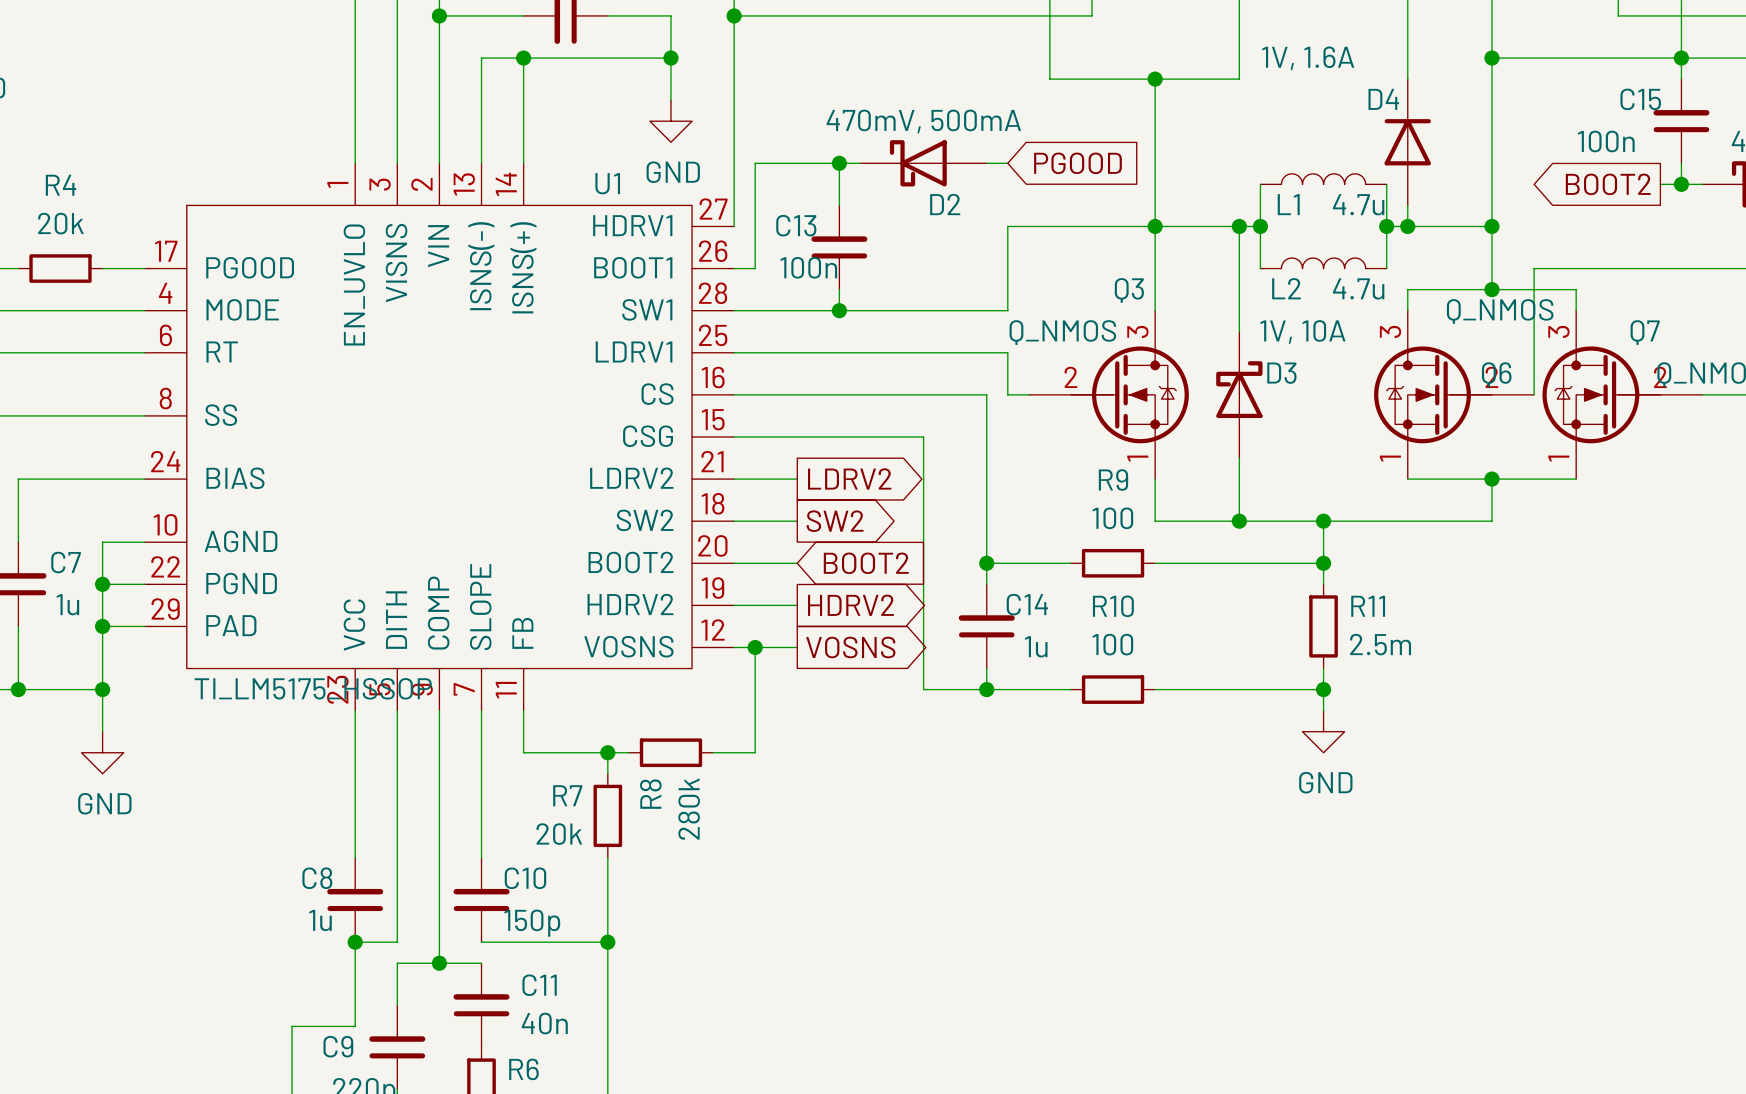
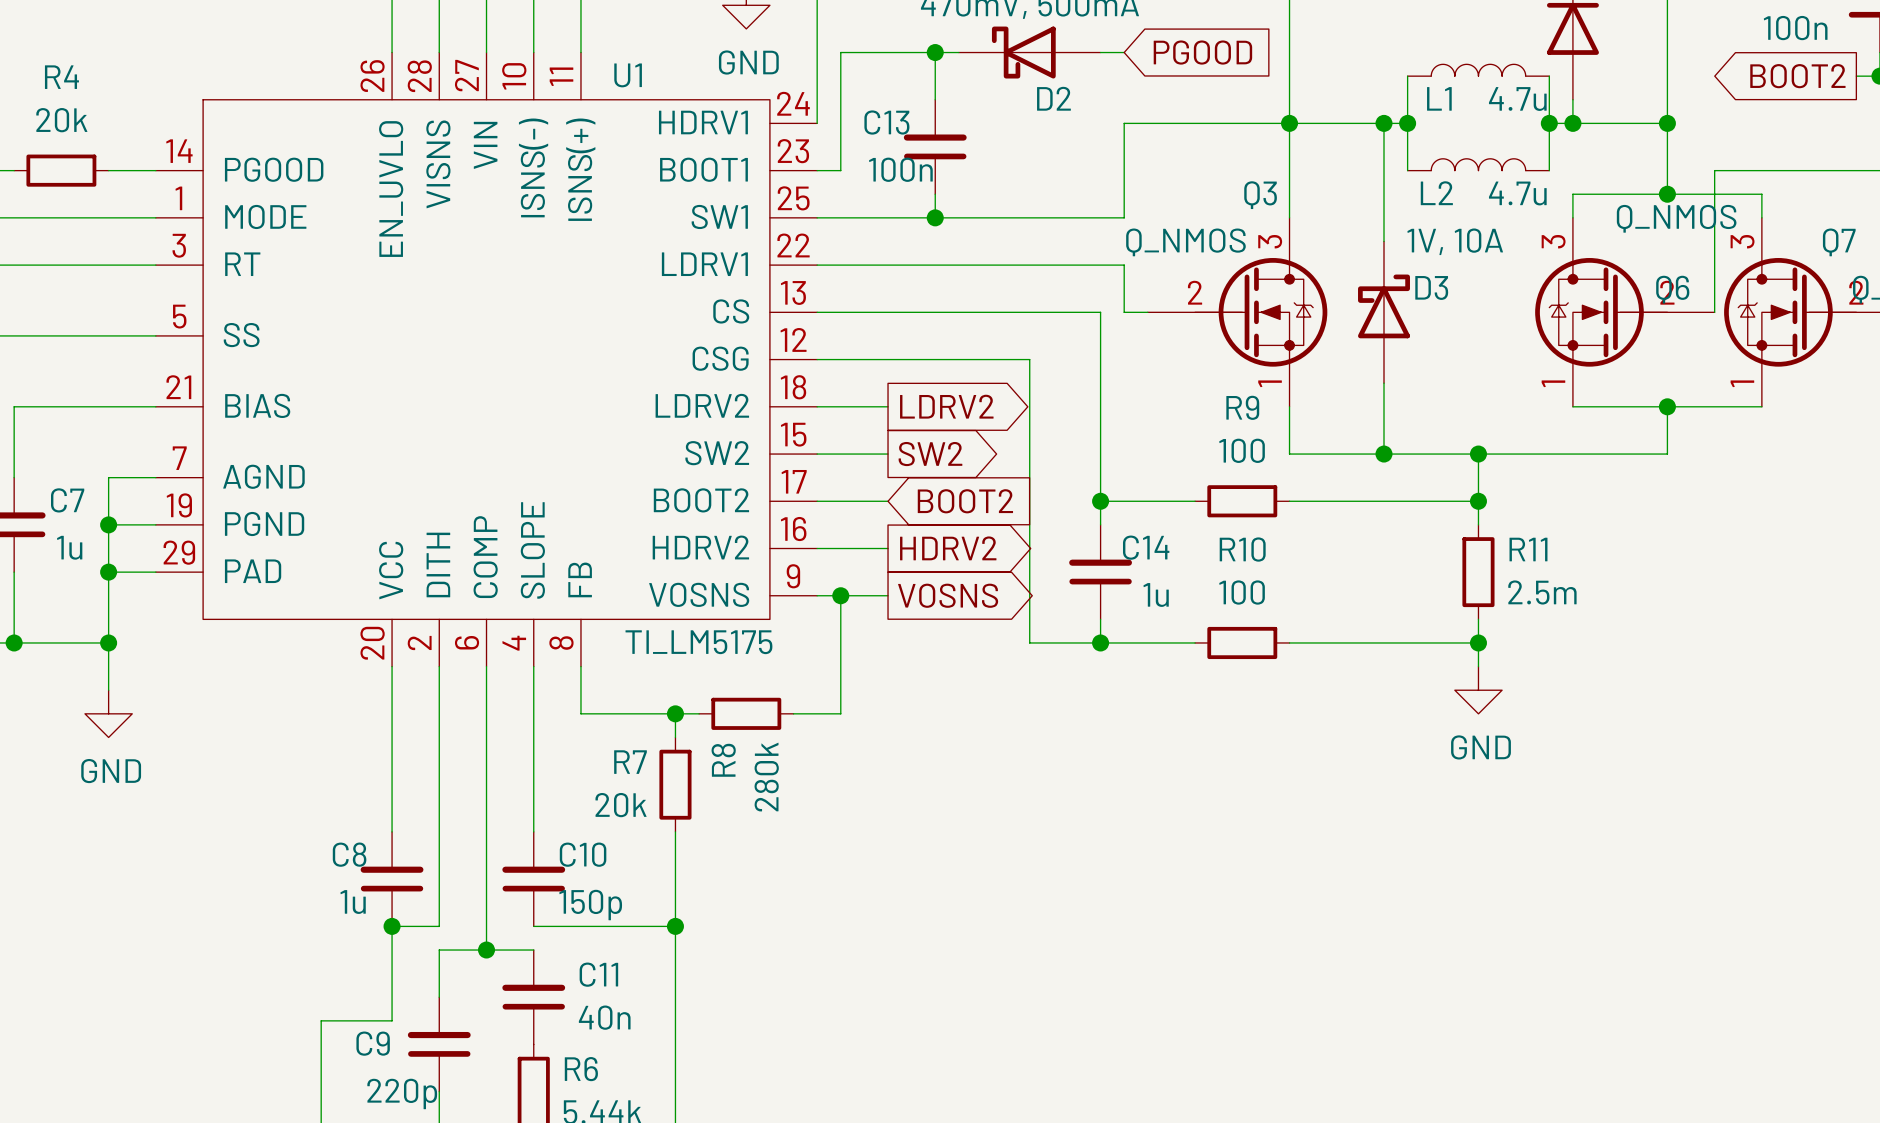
U1 symbol: [144, 163, 735, 711] -> [155, 52, 818, 667]
U1 name position: U1 (607, 183) -> U1 (628, 75)
U1 value: TI_LM5175_HSSOP (313, 688) -> TI_LM5175 (698, 642)

